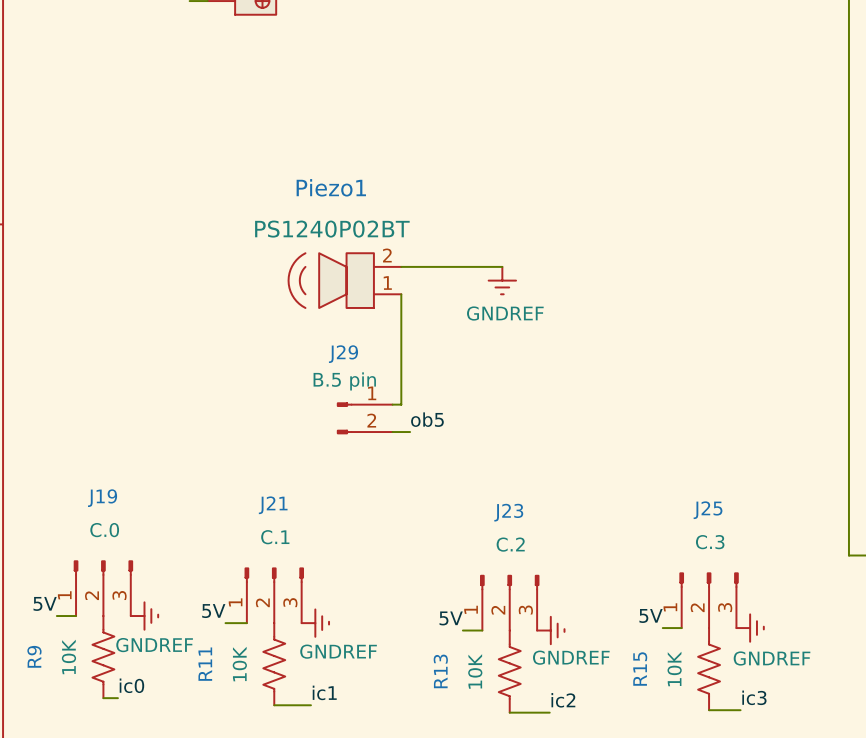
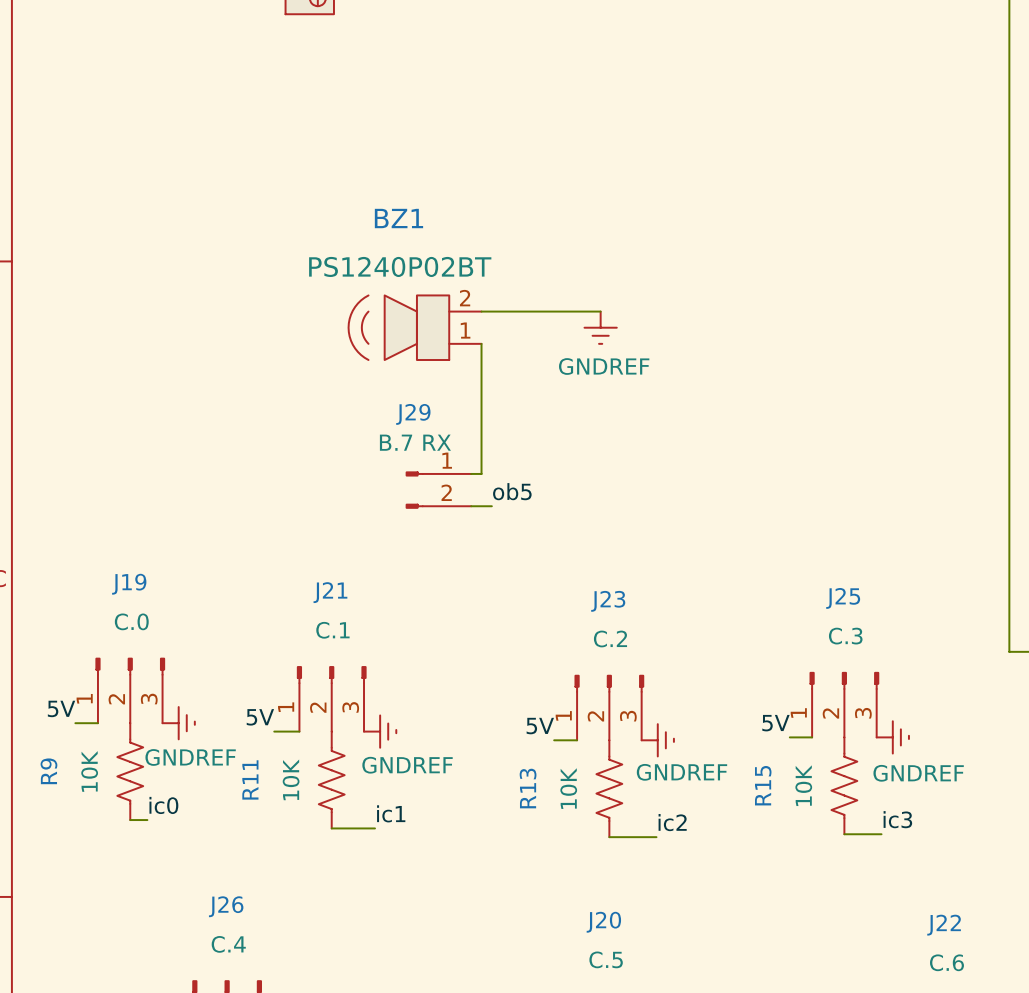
Piezo1 name: Piezo1 (331, 187) -> BZ1 (398, 218)
J29 value: B.5 pin (344, 381) -> B.7 RX (415, 442)

